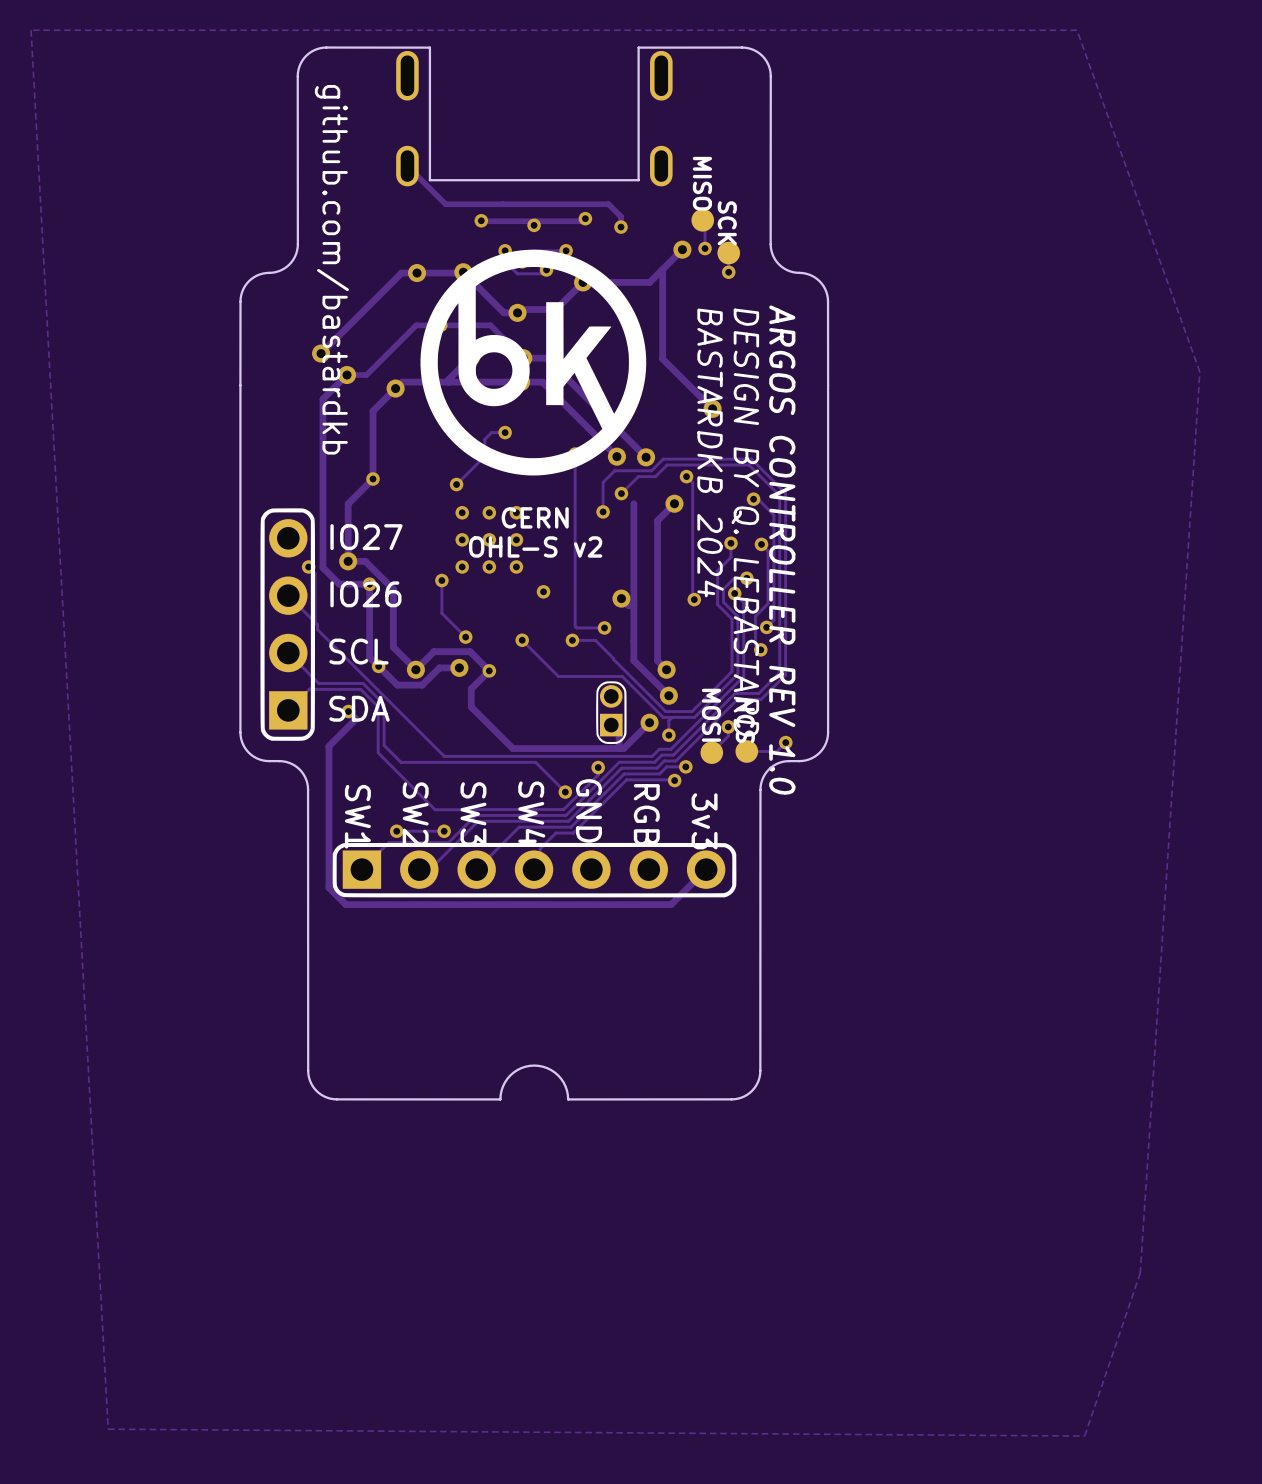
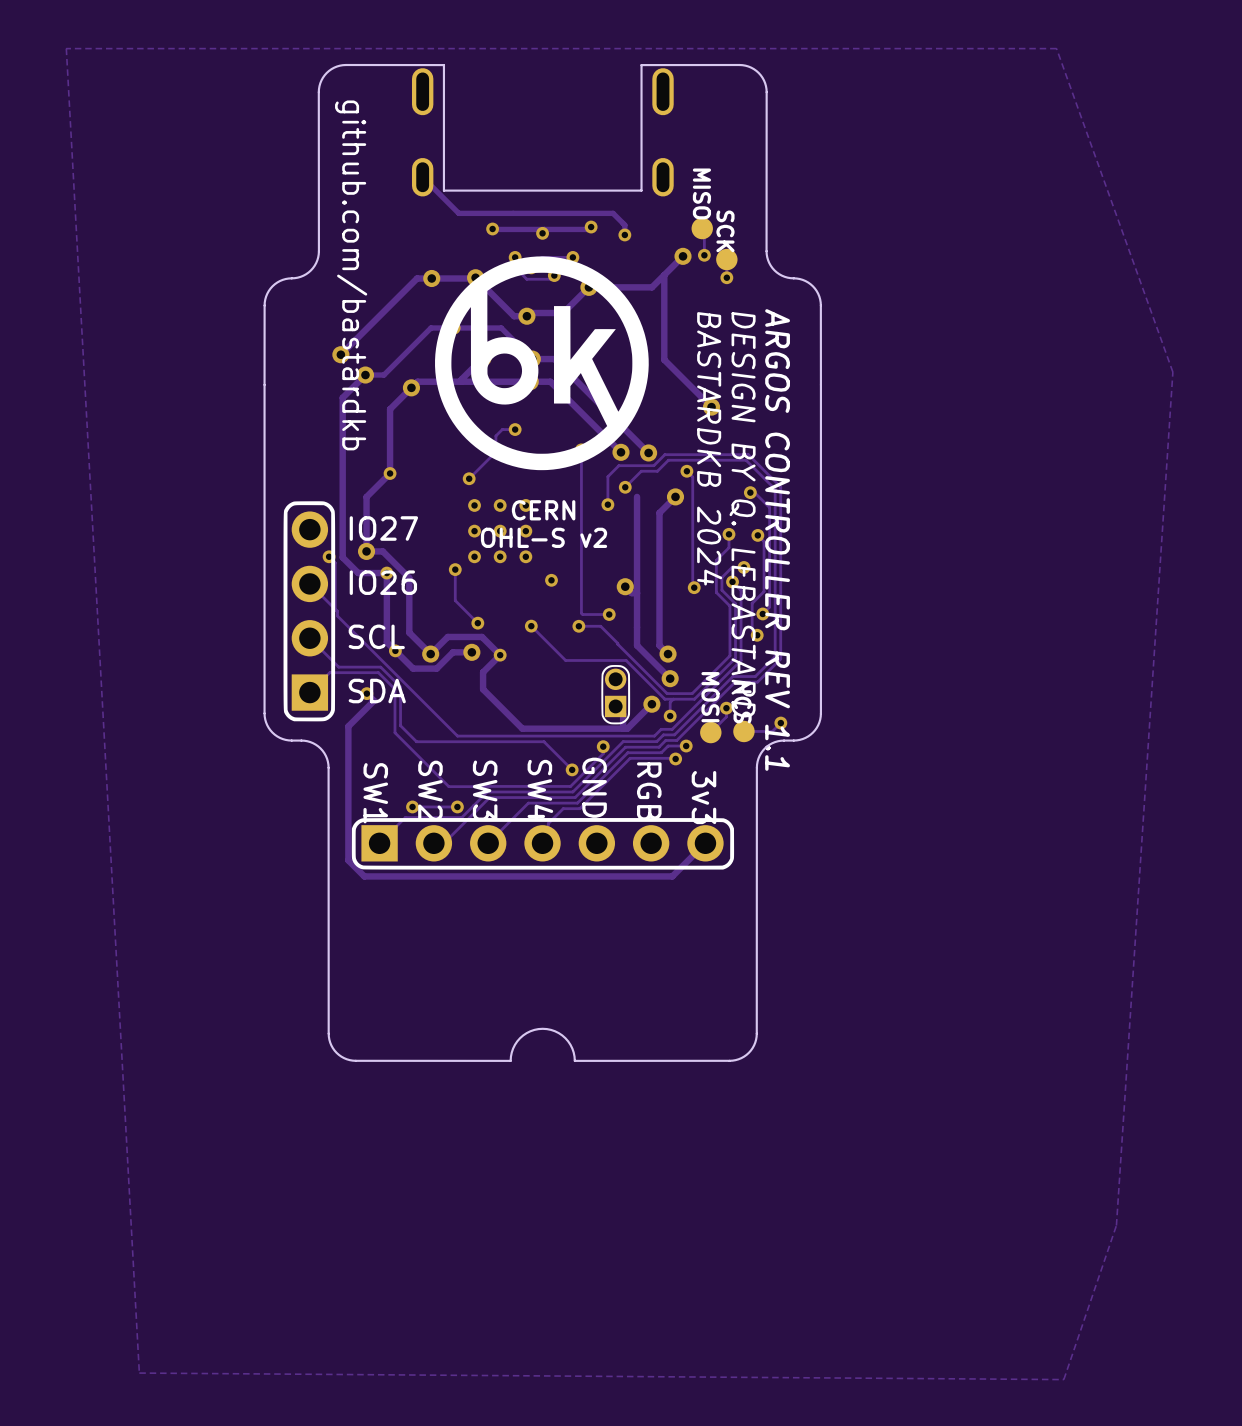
text: ARGOS CONTROLLER REV 1.0 (782, 550) -> ARGOS CONTROLLER REV 1.1 (777, 539)

